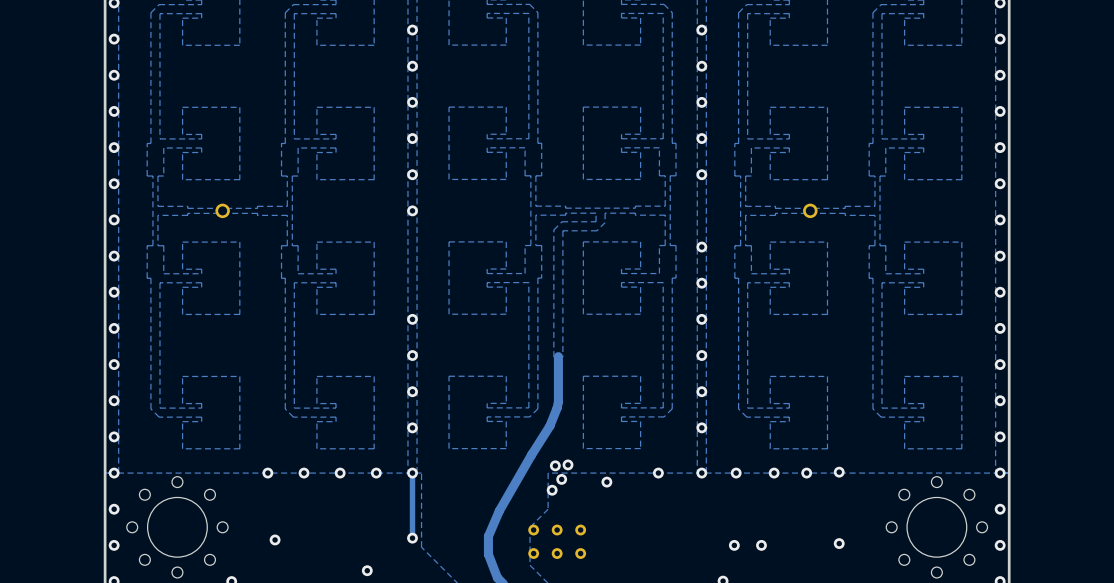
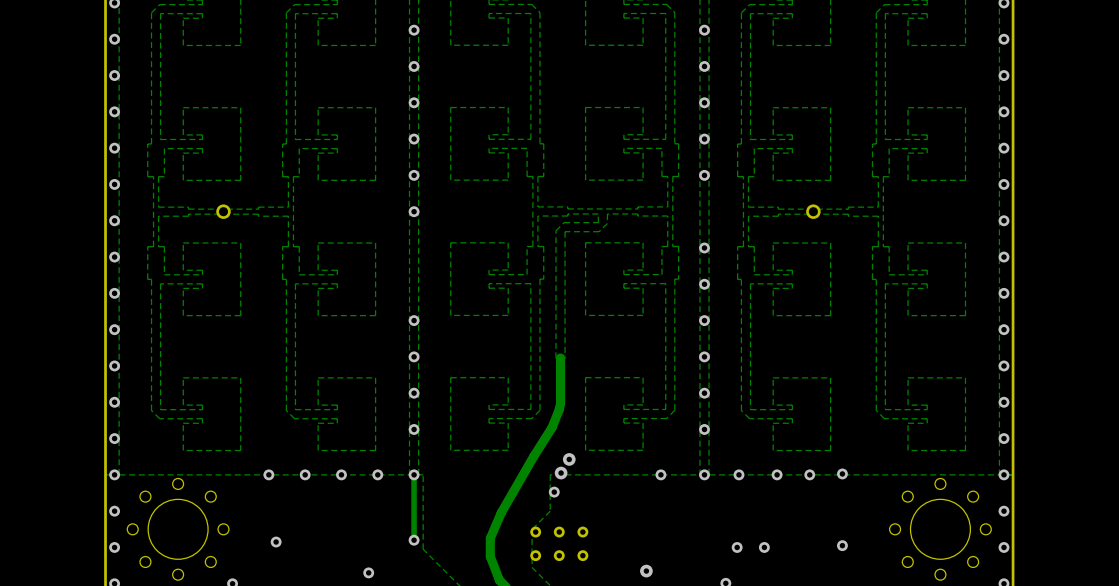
via: none -> (569, 459)
via: (568, 464) -> none
via: (555, 465) -> none
via: none -> (561, 473)
via: (561, 479) -> none
via: (606, 482) -> none
via: none -> (646, 571)

